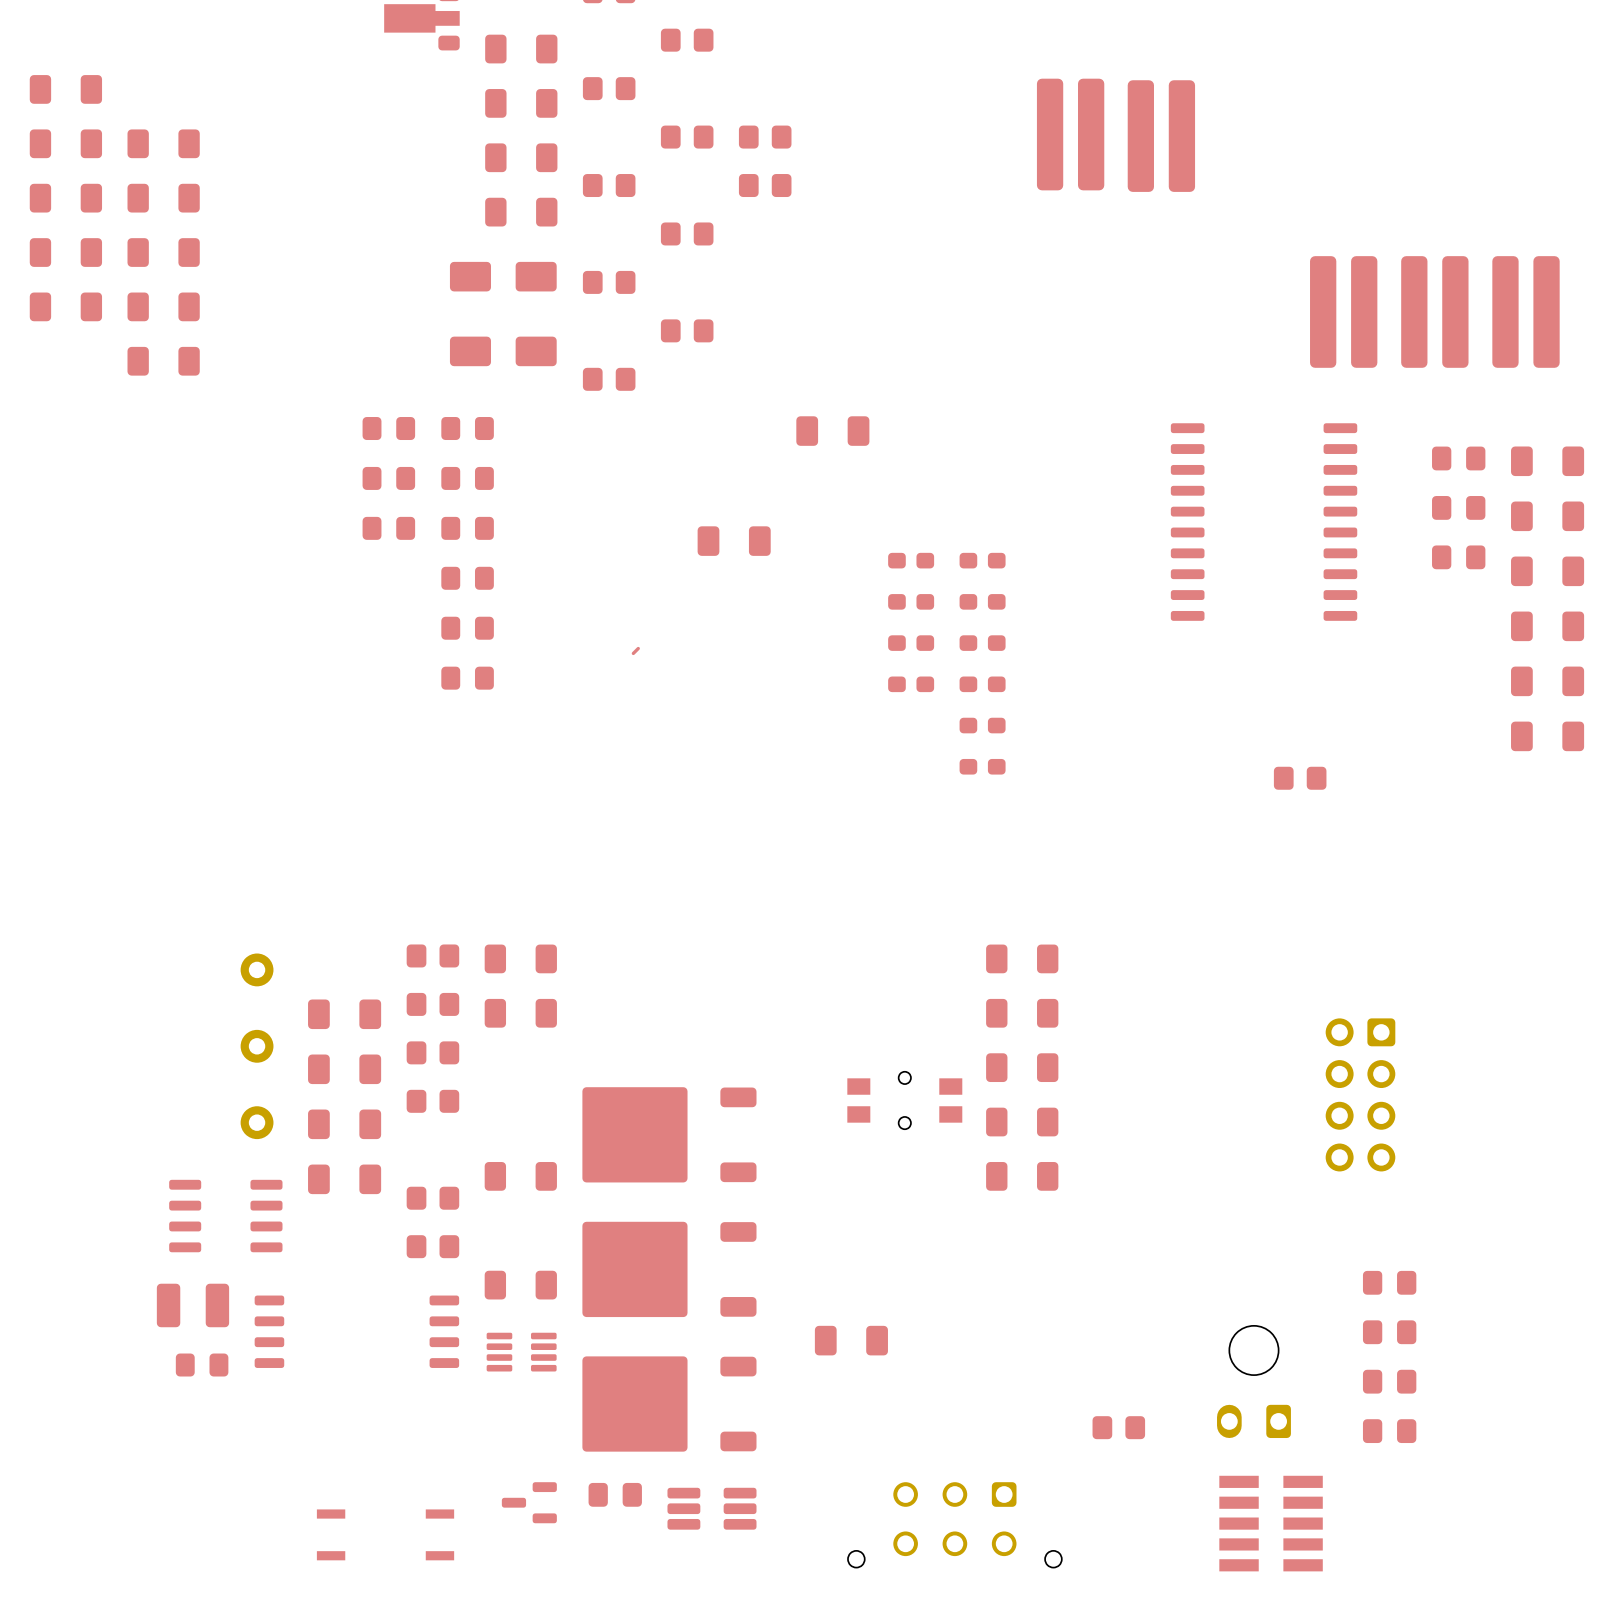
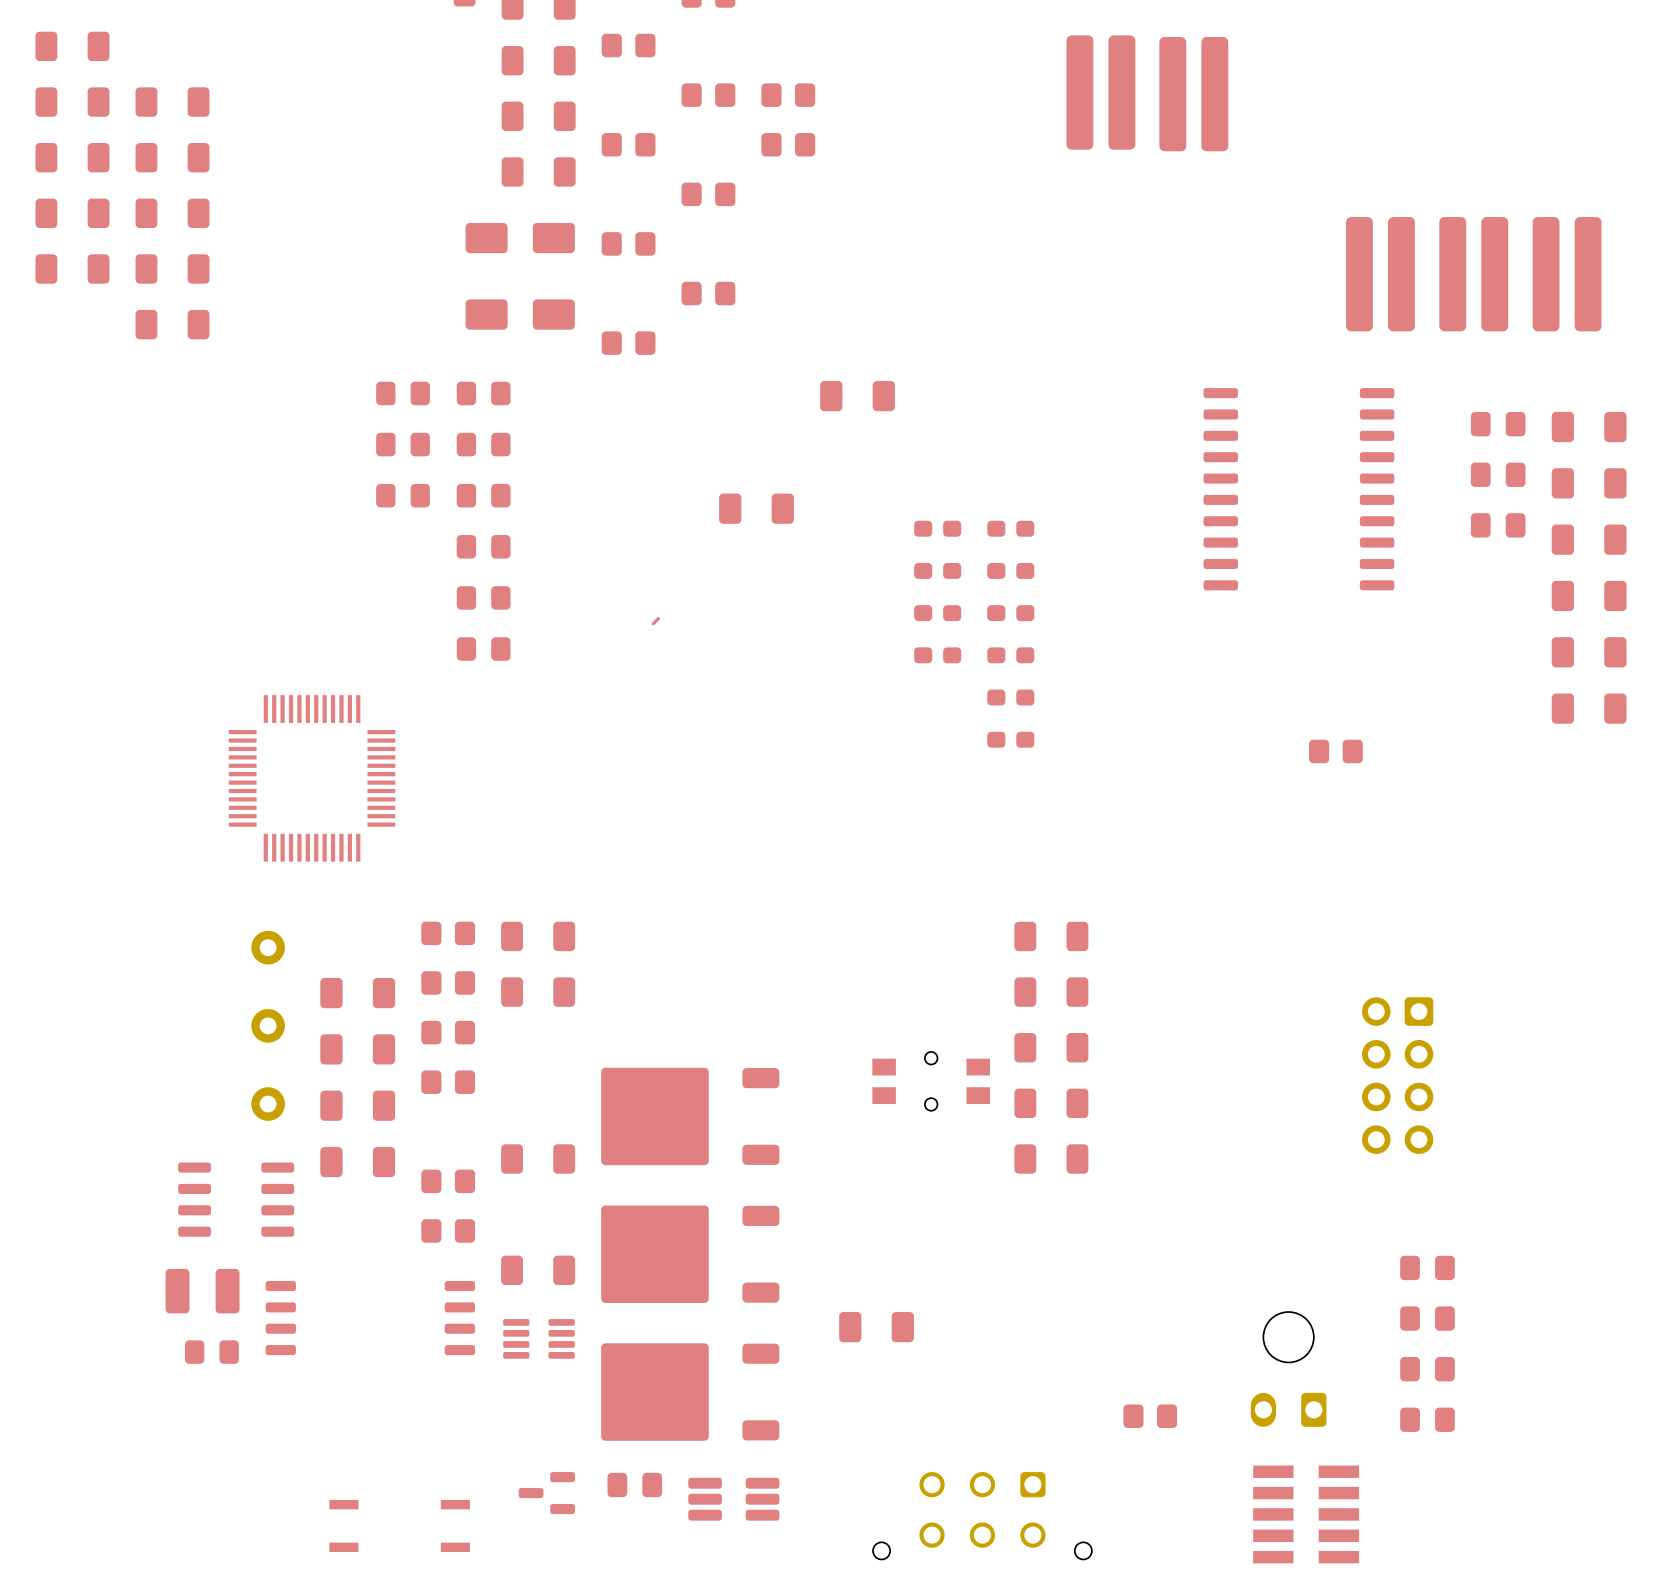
part: none -> (312, 778)

